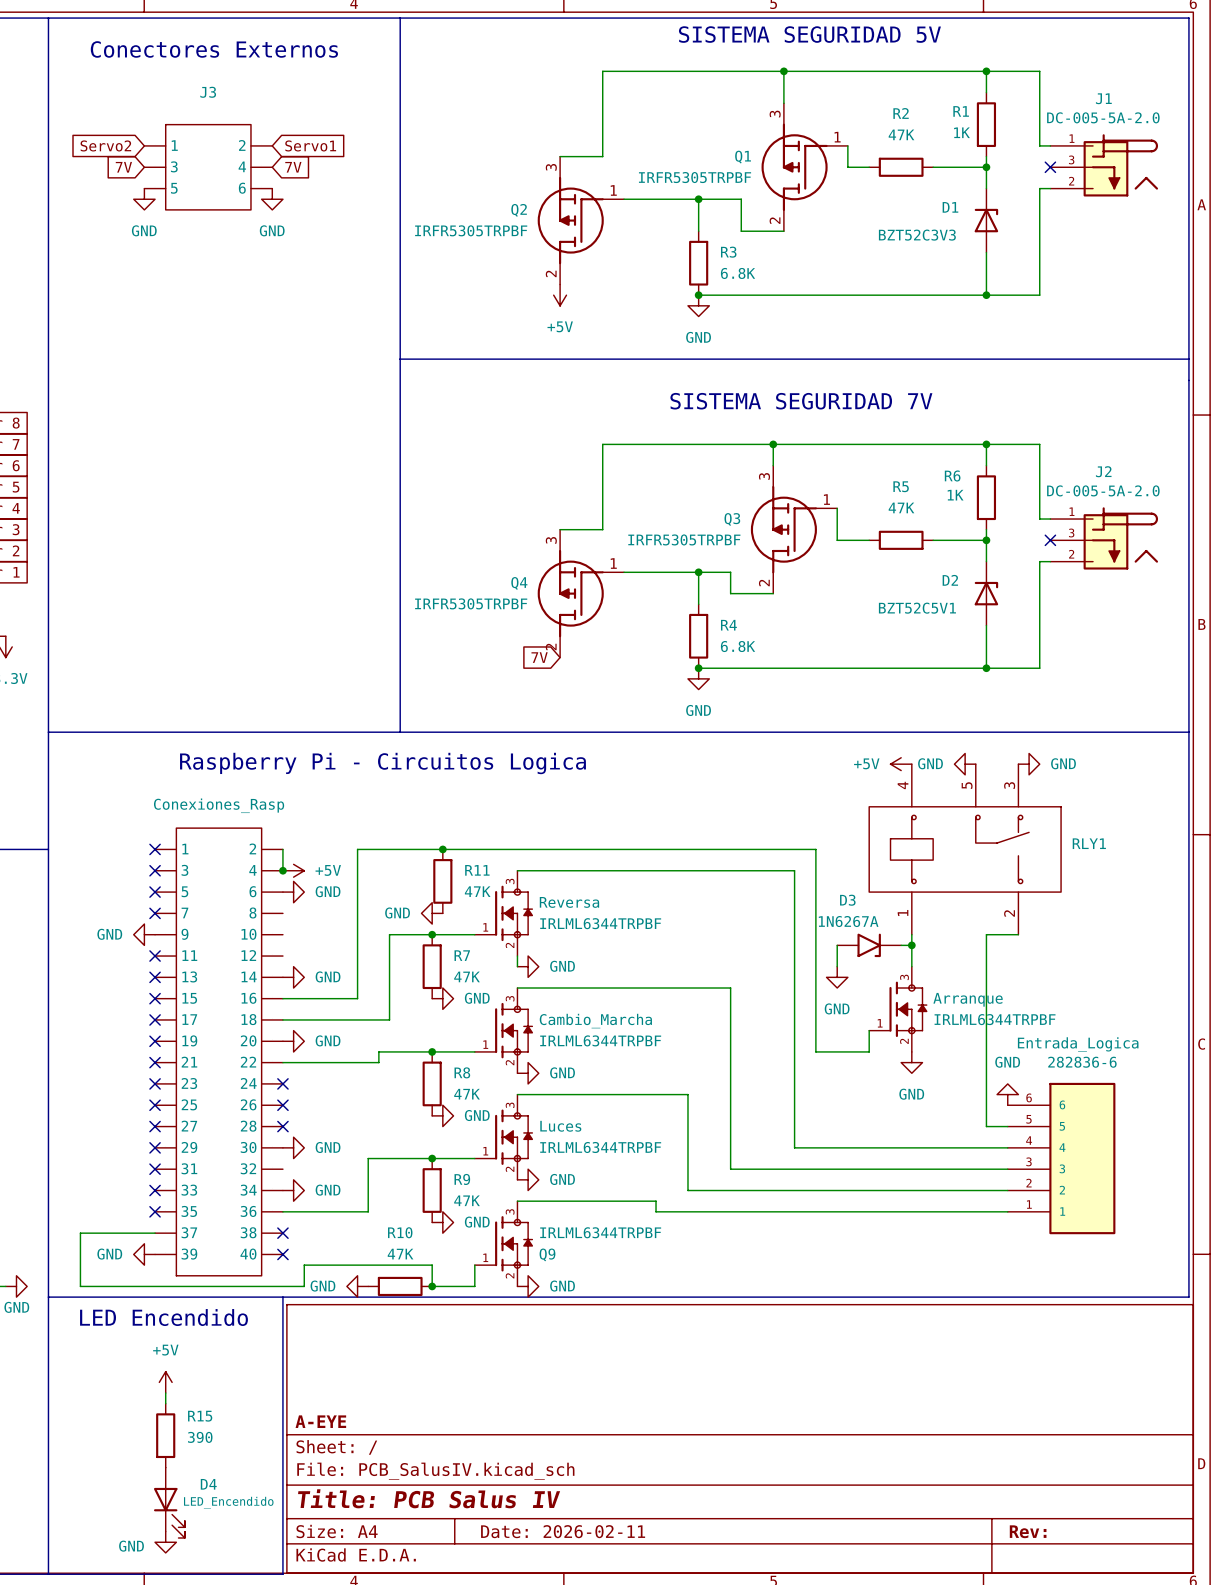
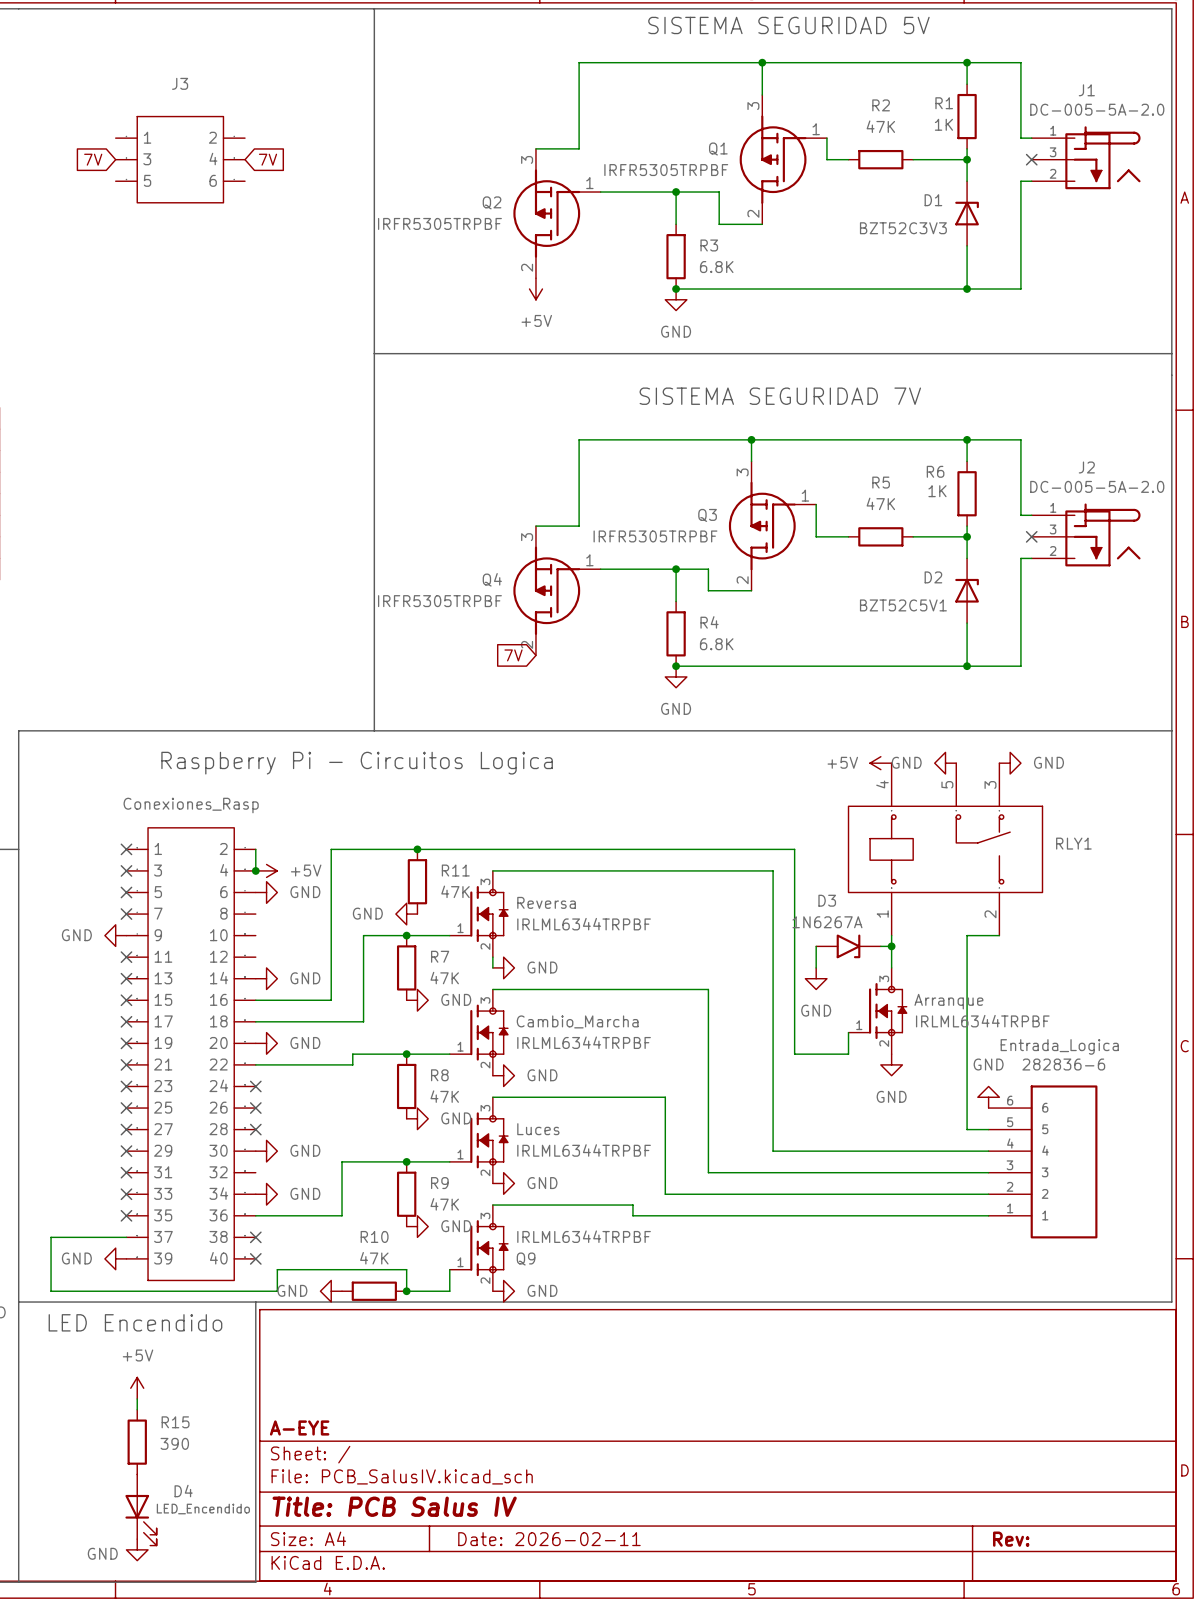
line: (48, 18) (48, 732) -> none
text: Conectores Externos (214, 49) -> none
global label: Servo2 (105, 145) -> none
global label: Servo1 (310, 145) -> none
power symbol: GND (144, 199) -> none
power symbol: GND (272, 199) -> none

